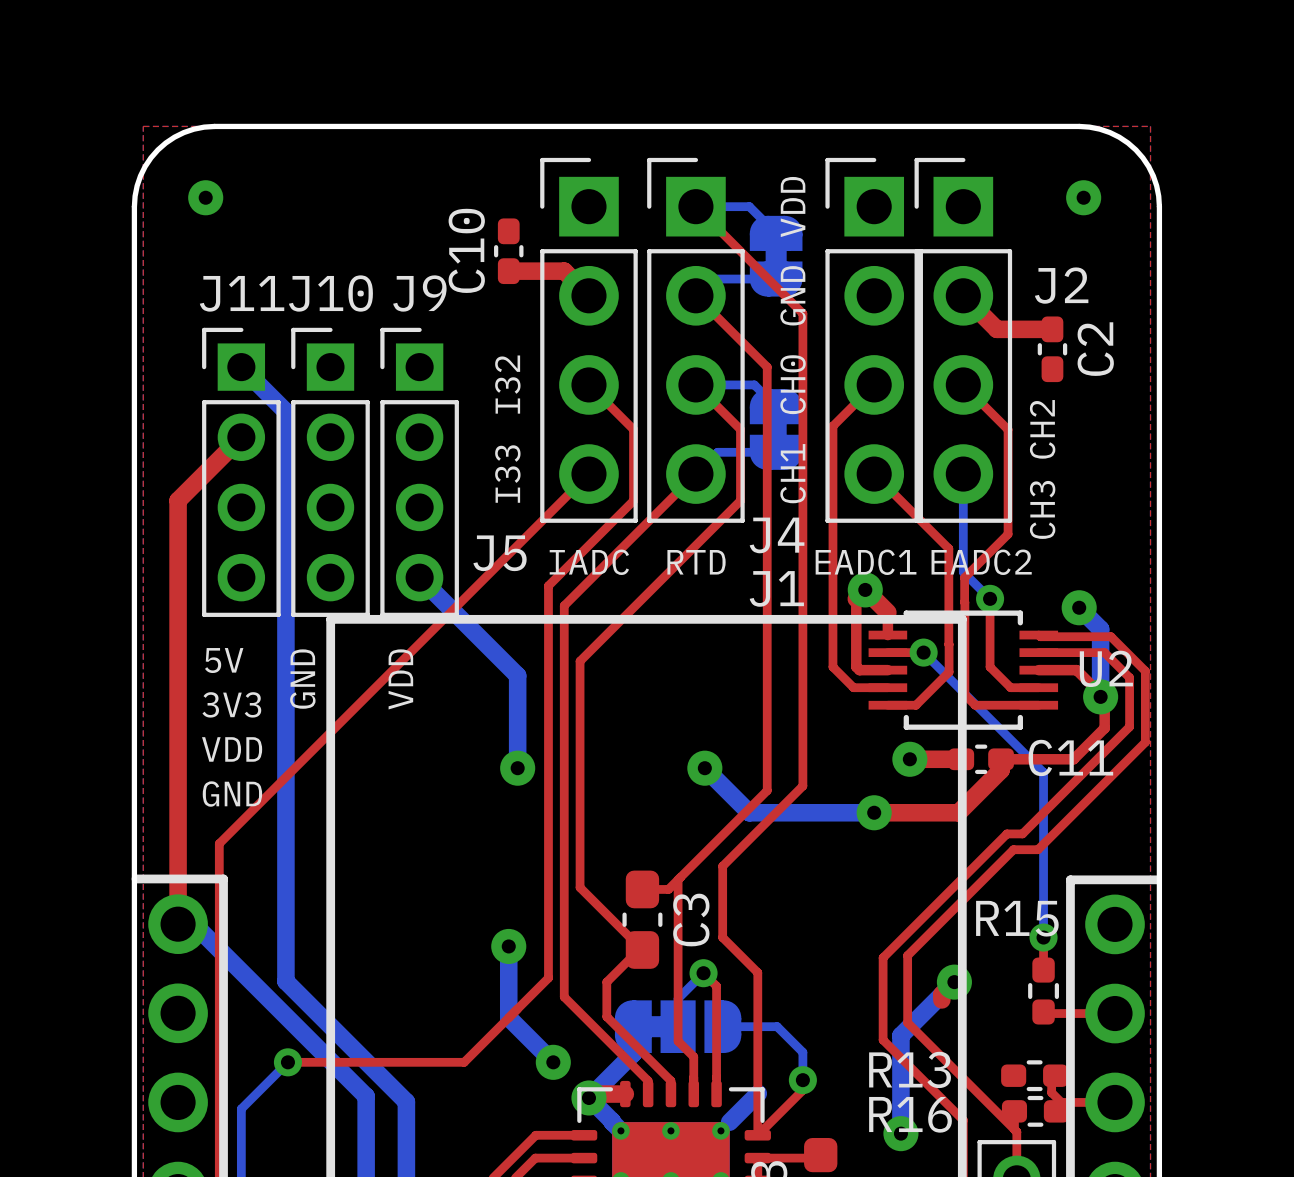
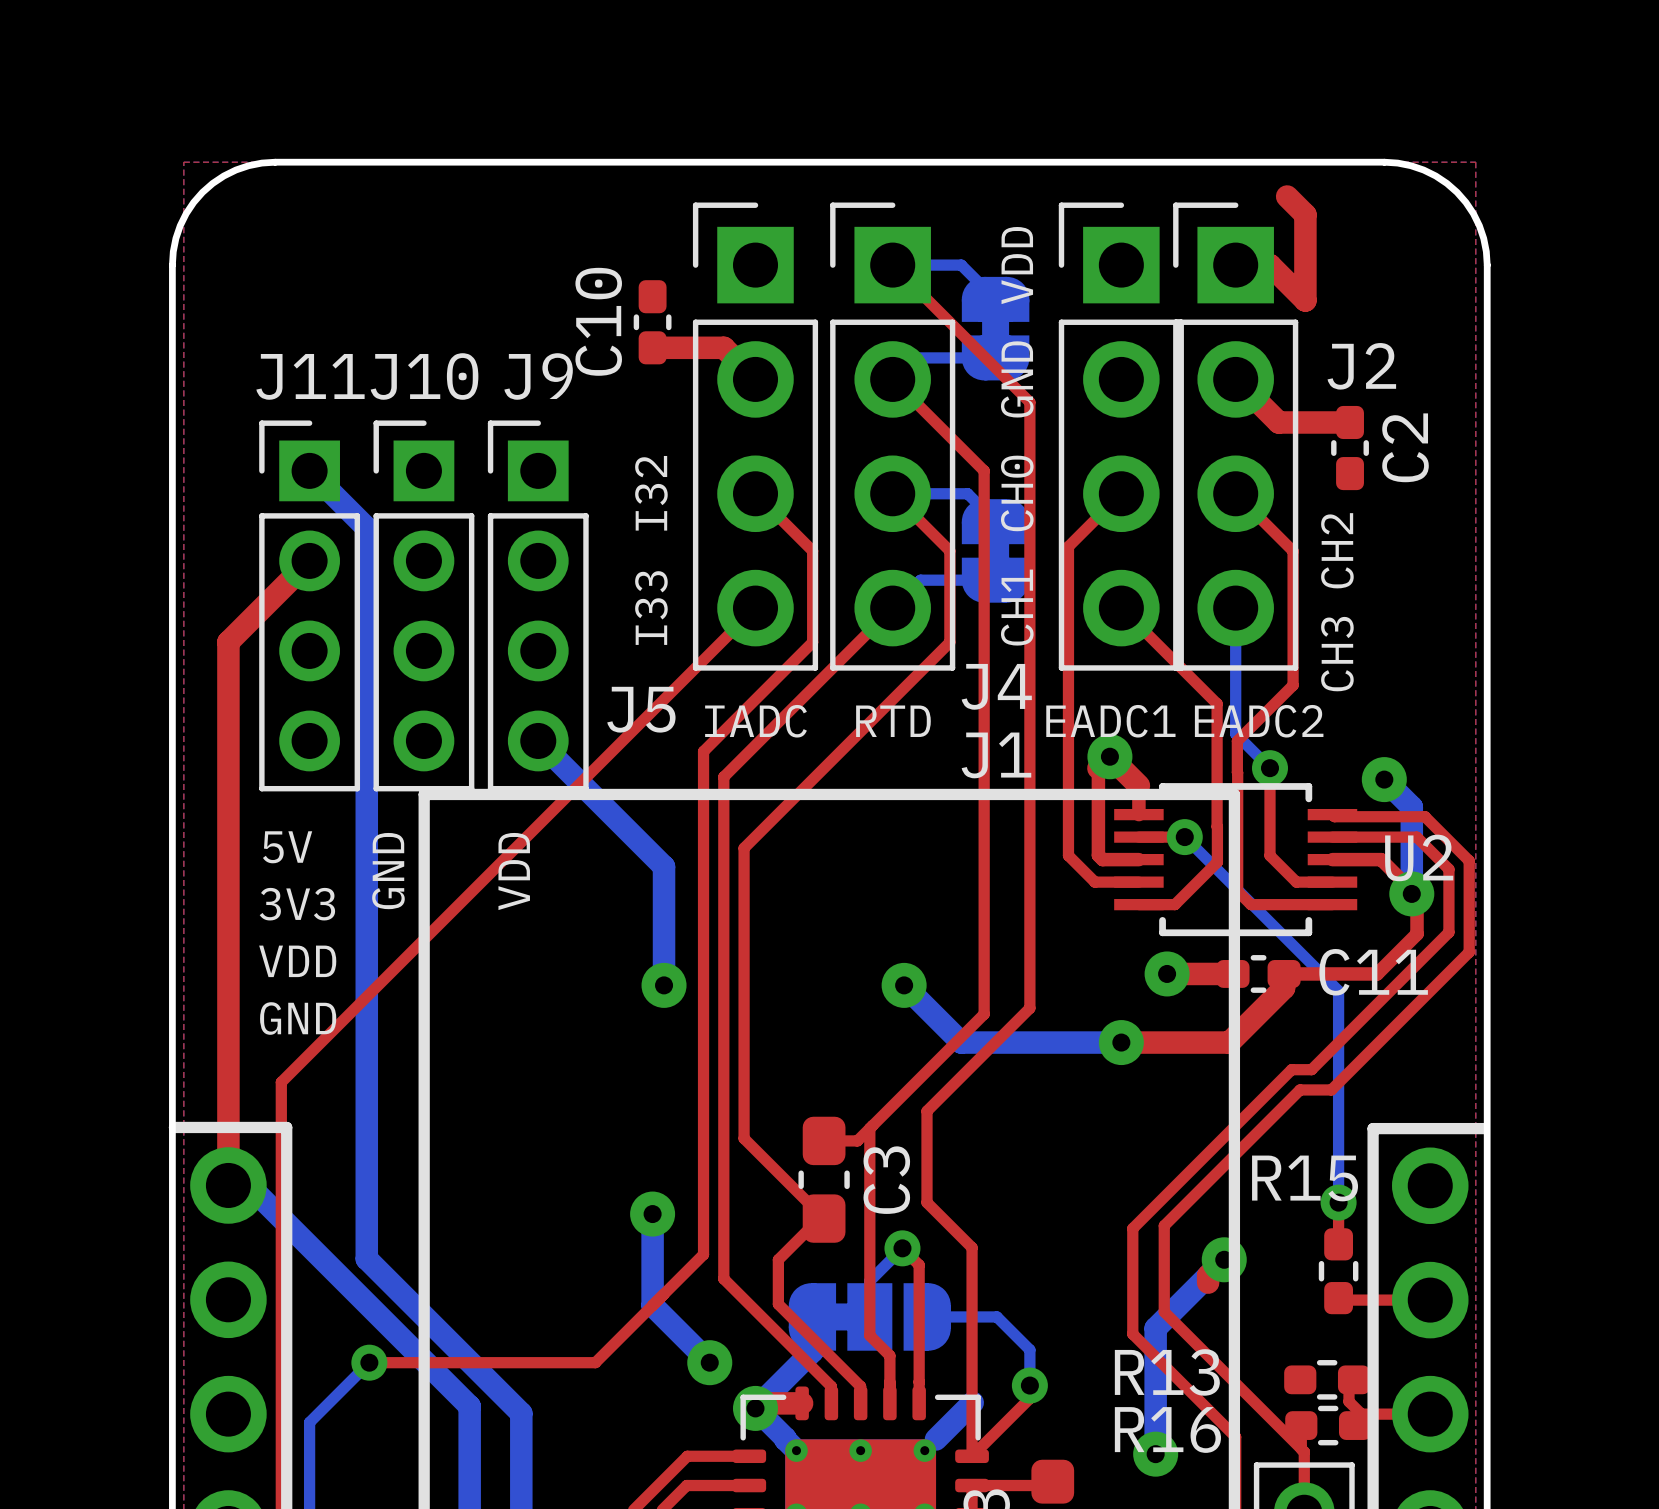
top track: none -> (1287, 196) (1305, 214) (1305, 300) (1269, 265) (1235, 265)
via: (205, 197) -> none
via: (1083, 197) -> none

